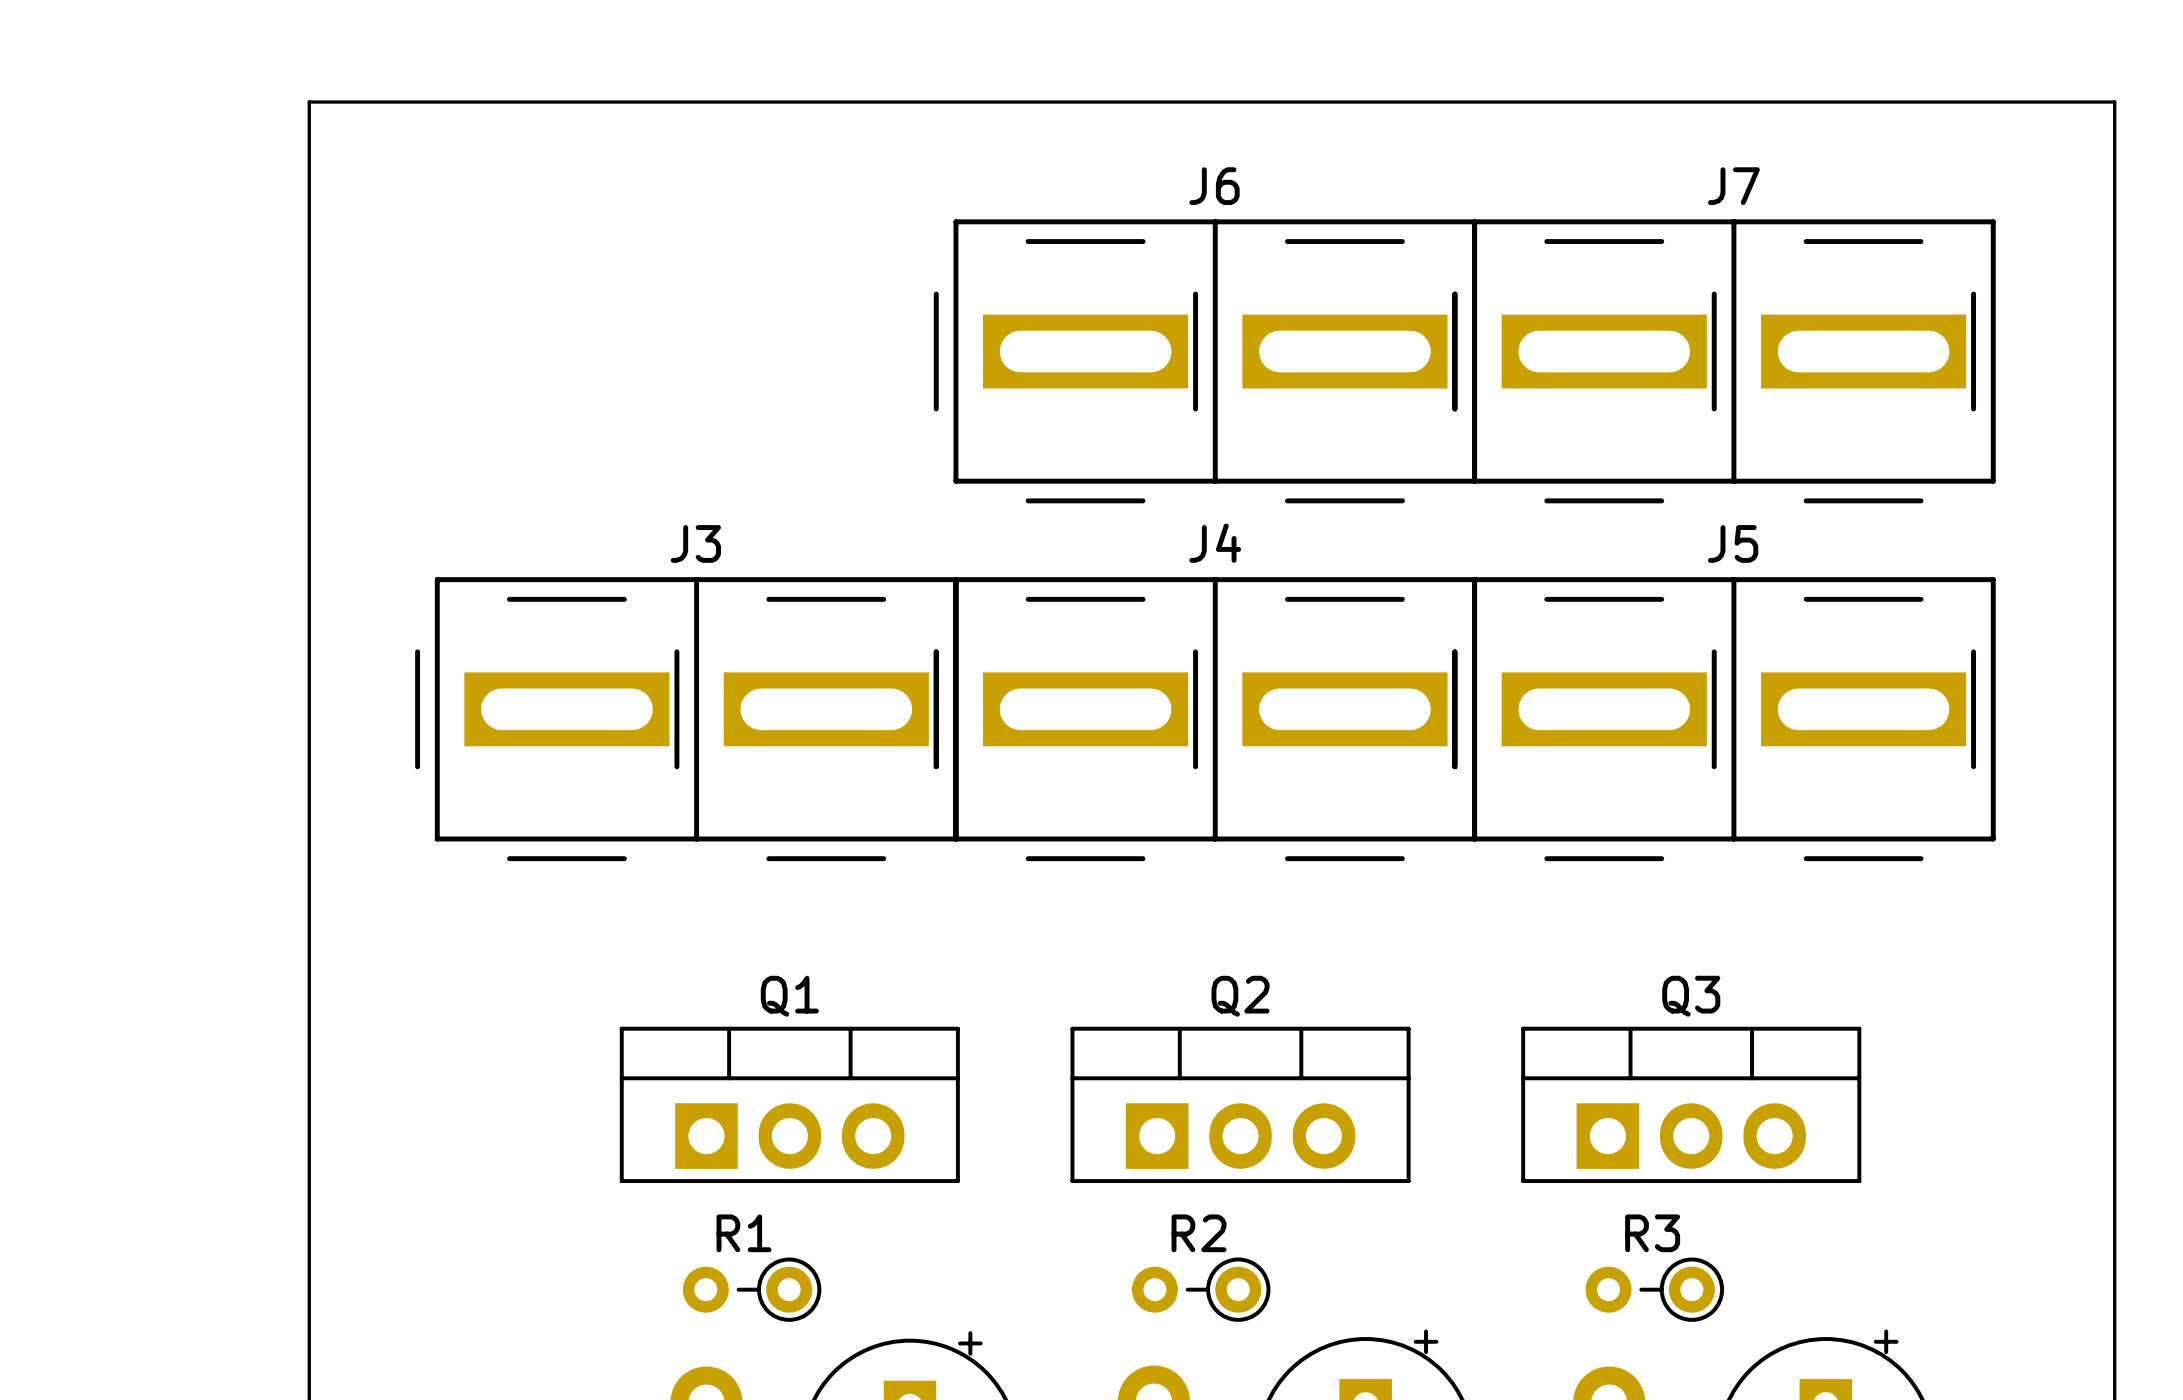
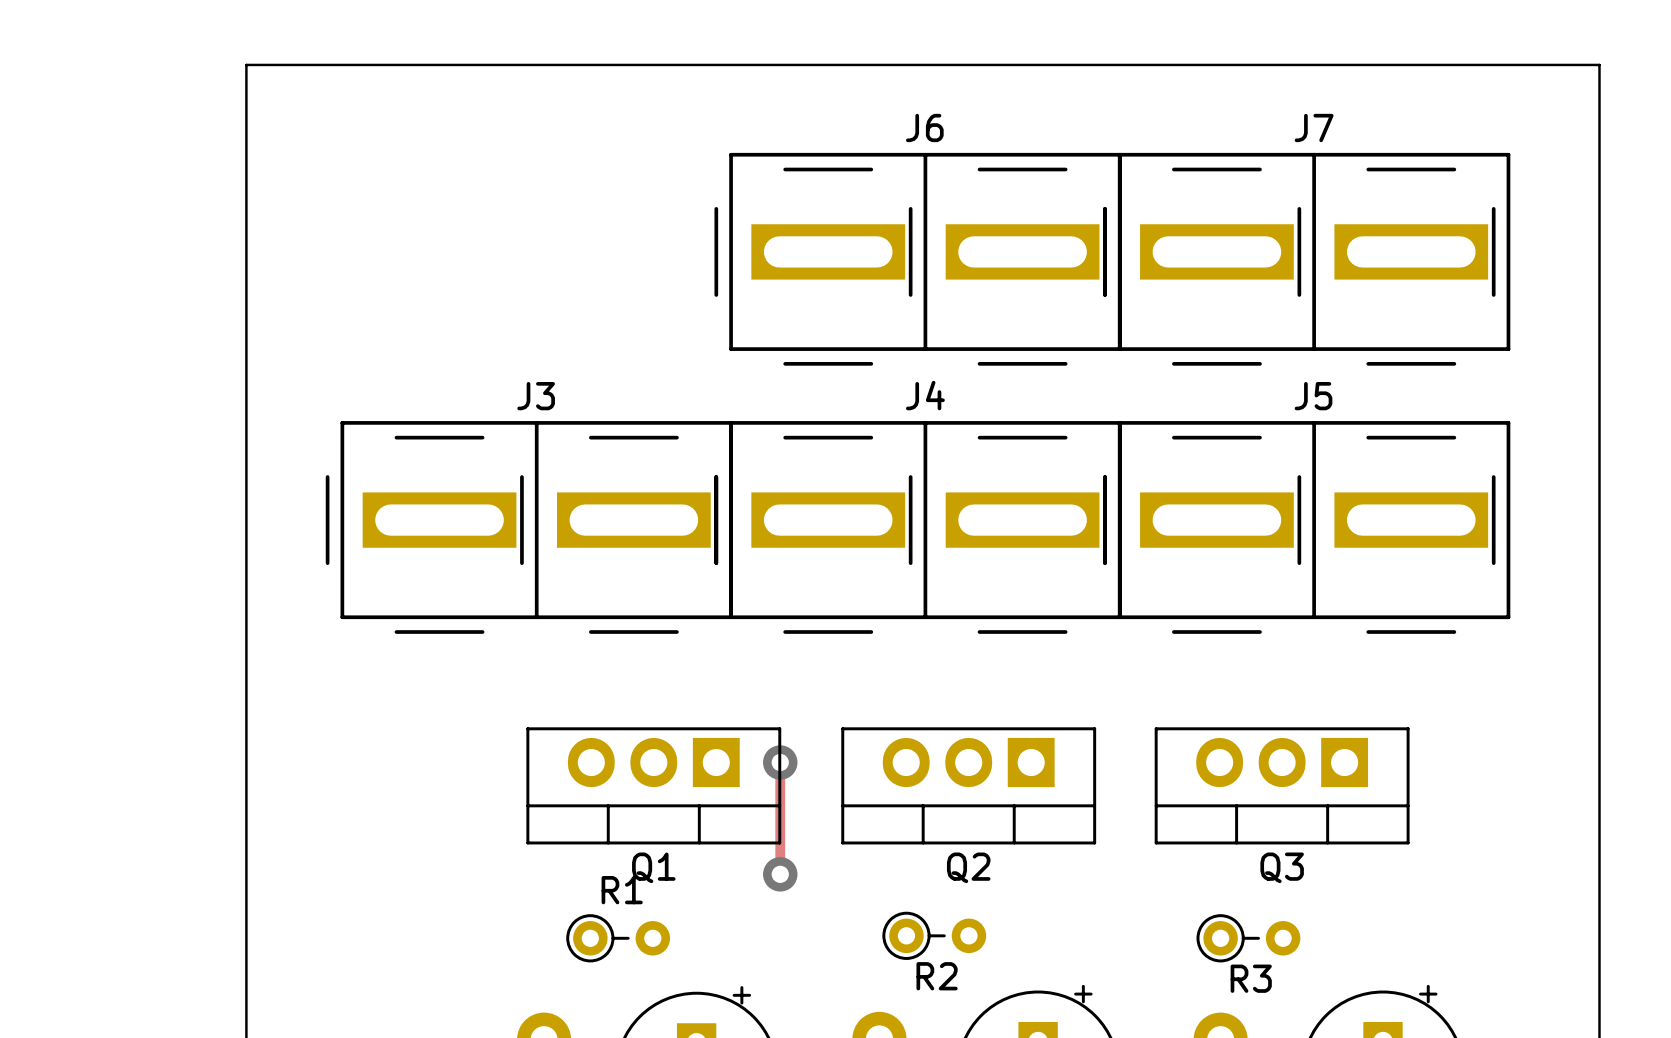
via: none -> (780, 762)
track: none -> (780, 763) (780, 874)
Q1 rotation: 0° (789, 1104) -> 180° (653, 785)
Q2 rotation: 0° (1240, 1104) -> 180° (968, 785)
Q3 rotation: 0° (1691, 1104) -> 180° (1282, 785)
via: none -> (780, 874)
R1 rotation: 0° (752, 1289) -> 180° (618, 938)
R2 rotation: 0° (1201, 1289) -> 180° (934, 935)
R3 rotation: 0° (1654, 1289) -> 180° (1248, 938)

